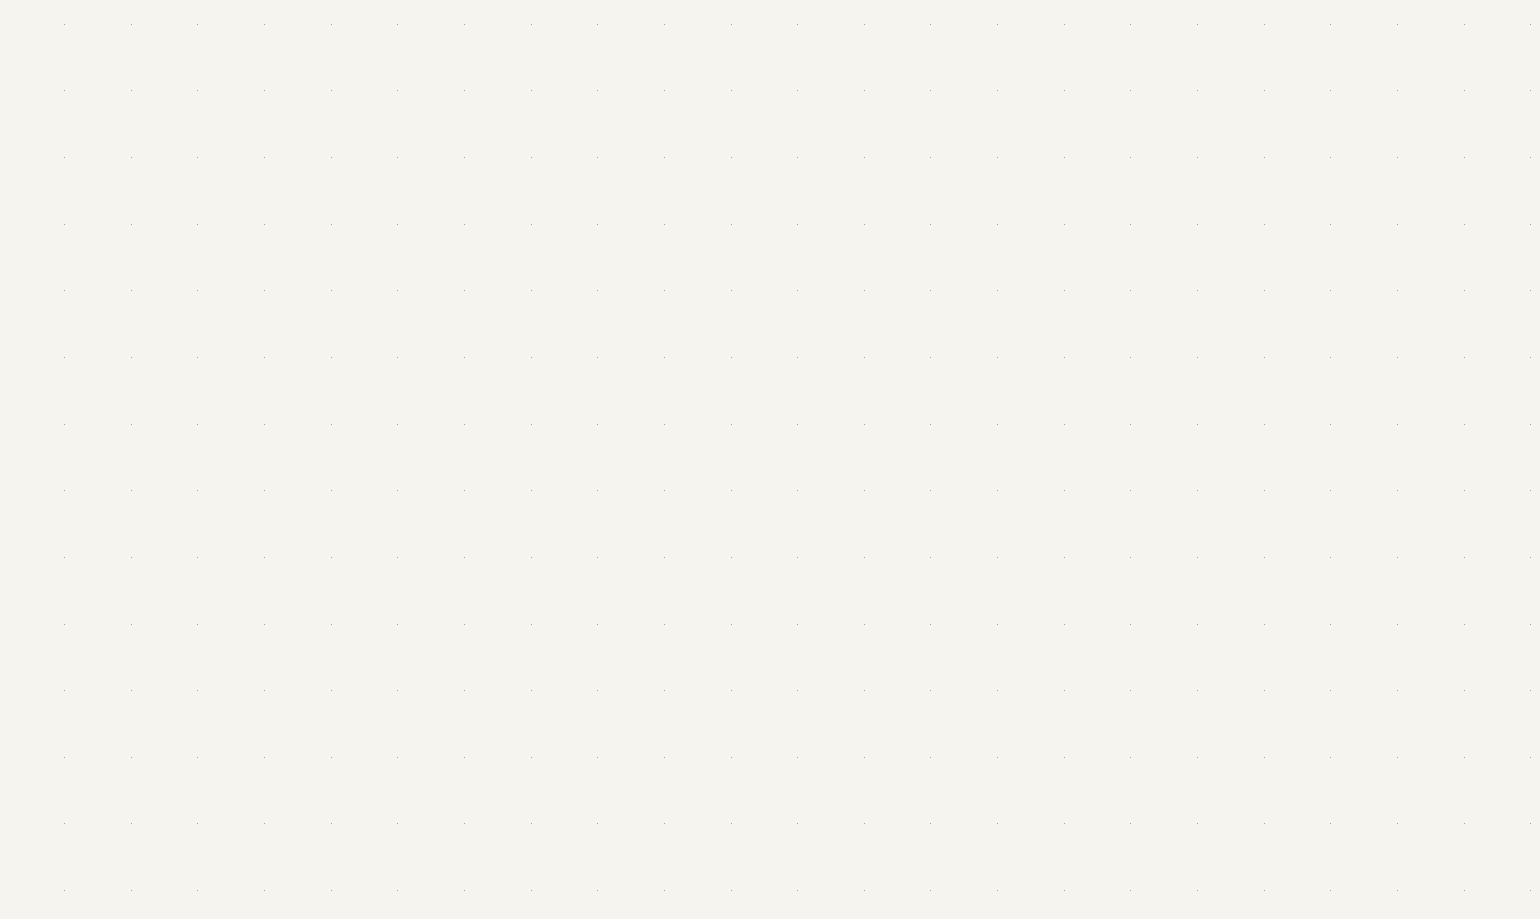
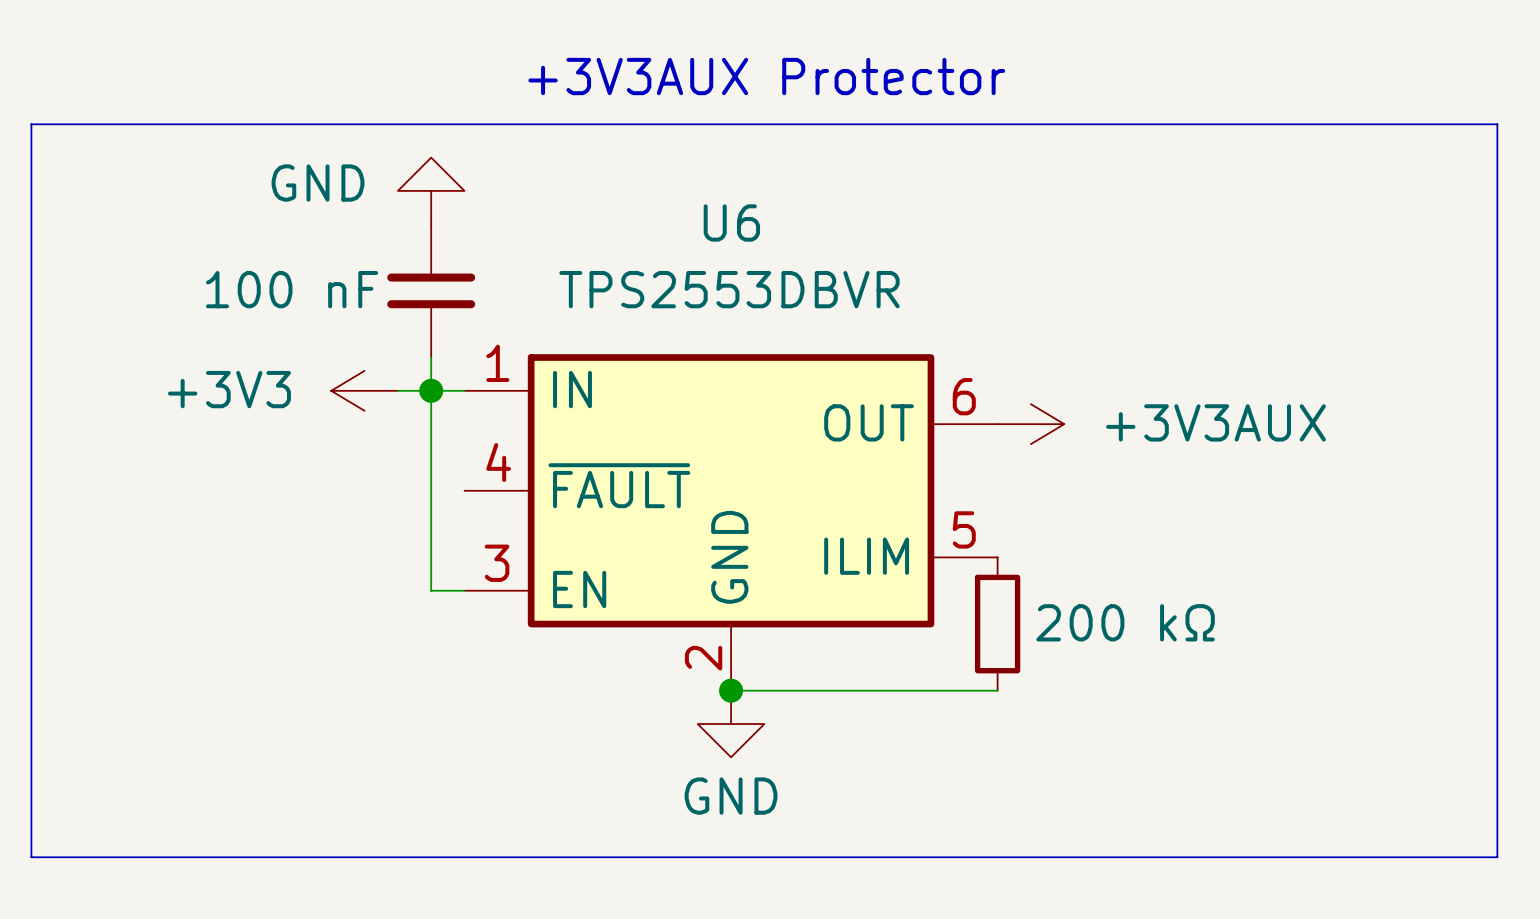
text: none -> +3V3AUX Protector (766, 76)
line: none -> (31, 124) (1497, 124) (1497, 857) (31, 857) (31, 124)
power symbol: none -> GND (431, 190)
part: none -> 100 nF (431, 290)
wire: none -> (431, 357) (431, 590) (464, 590)
power symbol: none -> +3V3 (364, 390)
wire: none -> (397, 390) (464, 390)
junction: none -> (431, 390)
power symbol: none -> +3V3AUX (1030, 424)
U6: none -> TPS2553DBVR (731, 522)
part: none -> 200 kΩ (997, 624)
wire: none -> (731, 690) (997, 690)
junction: none -> (731, 690)
power symbol: none -> GND (731, 724)

